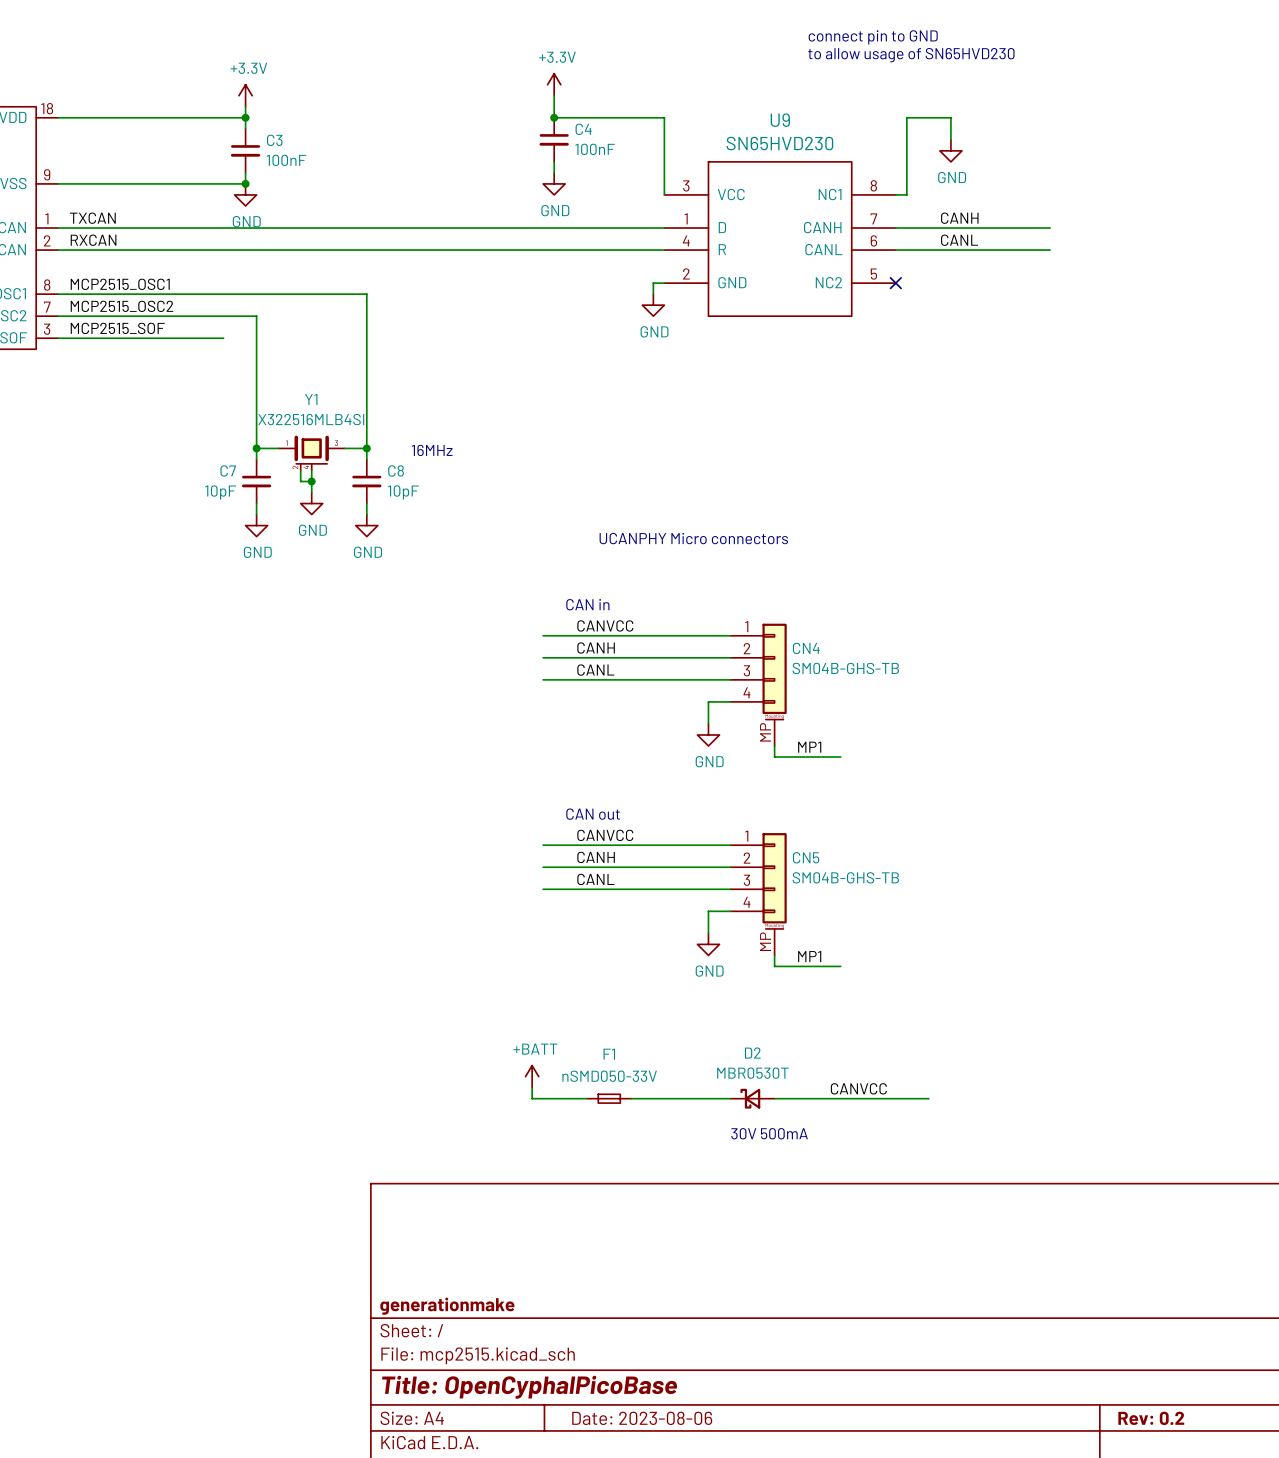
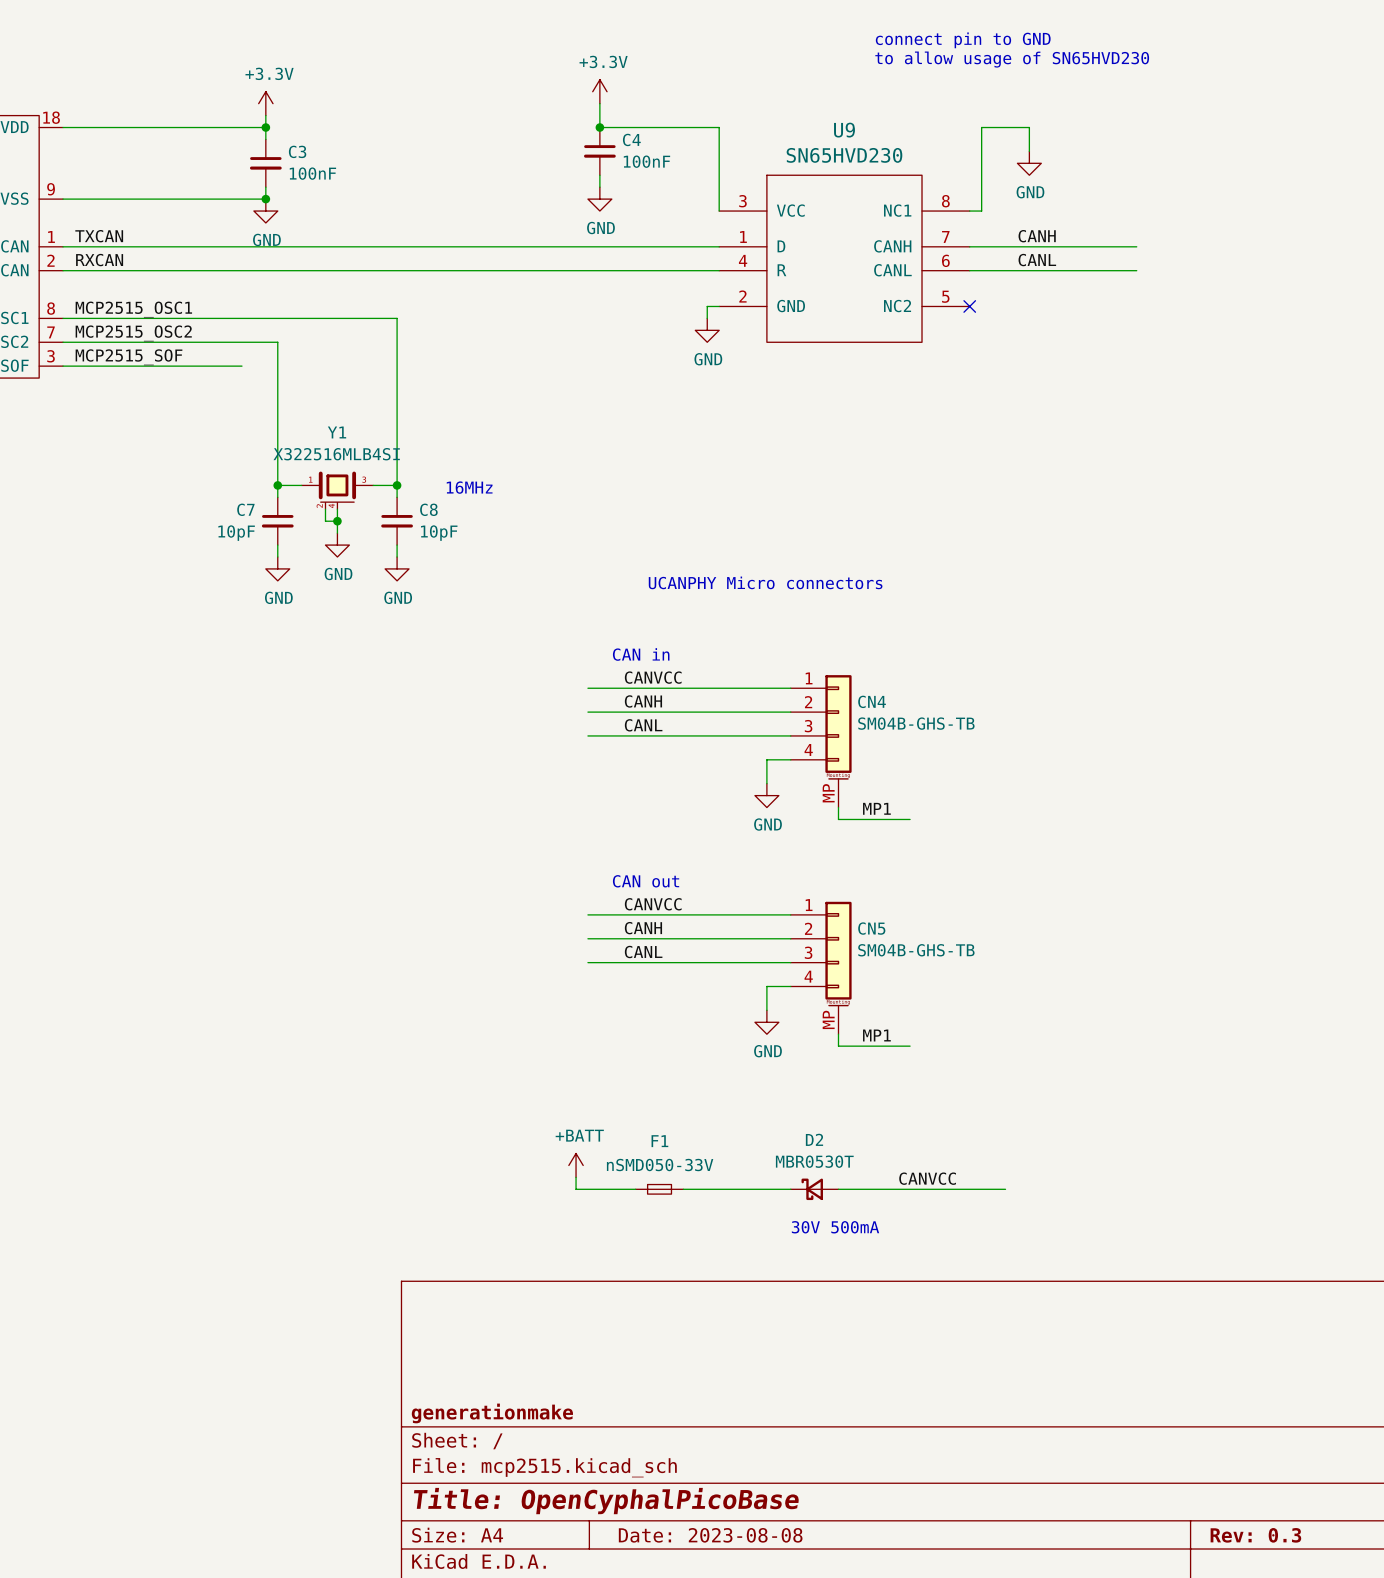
title block: Date: 2023-08-06 (642, 1418) -> Date: 2023-08-08 (710, 1535)
title block: Rev: 0.2 (1151, 1418) -> Rev: 0.3 (1255, 1535)

